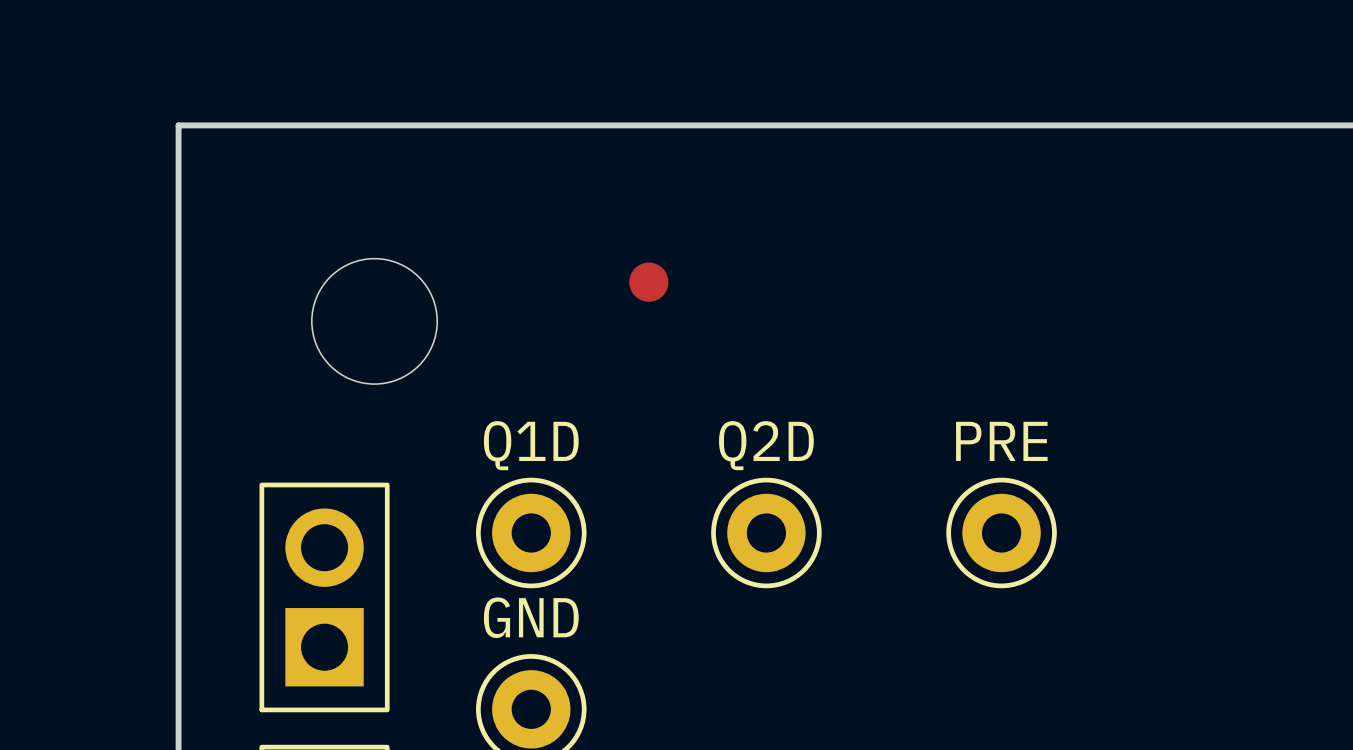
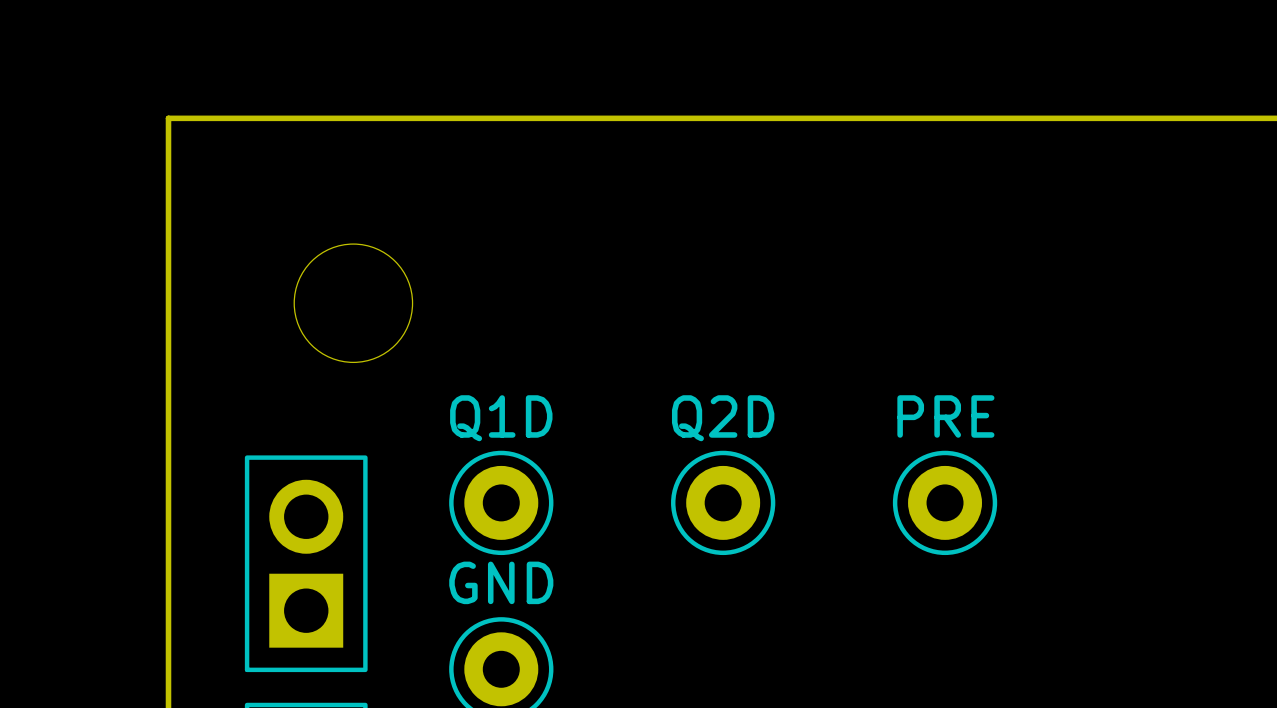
part: (648, 282) -> none

